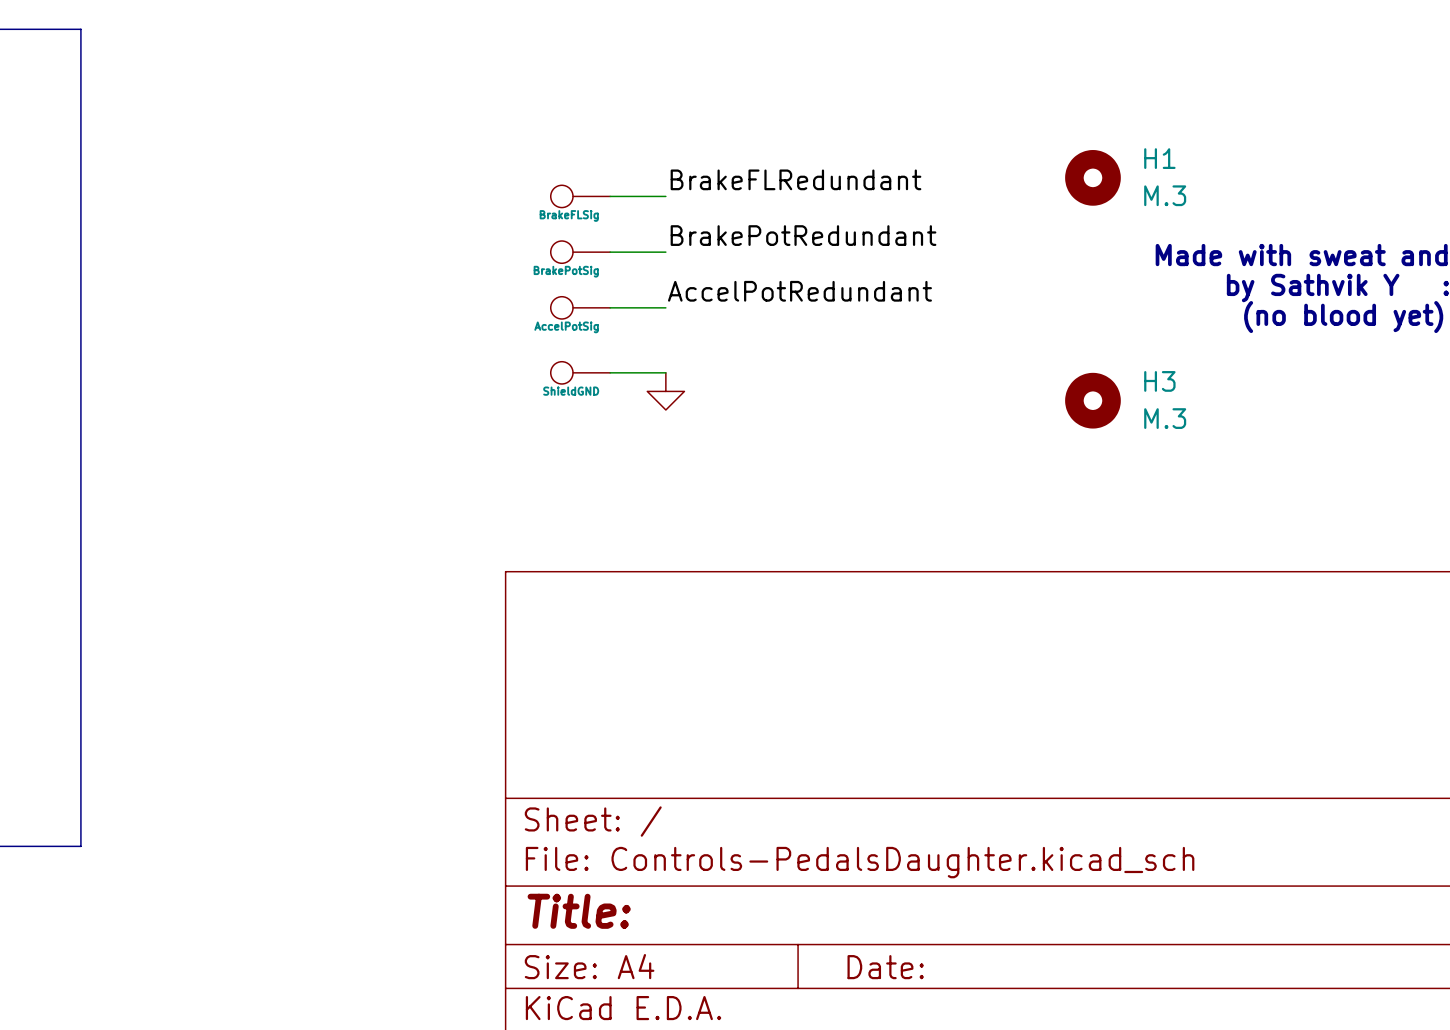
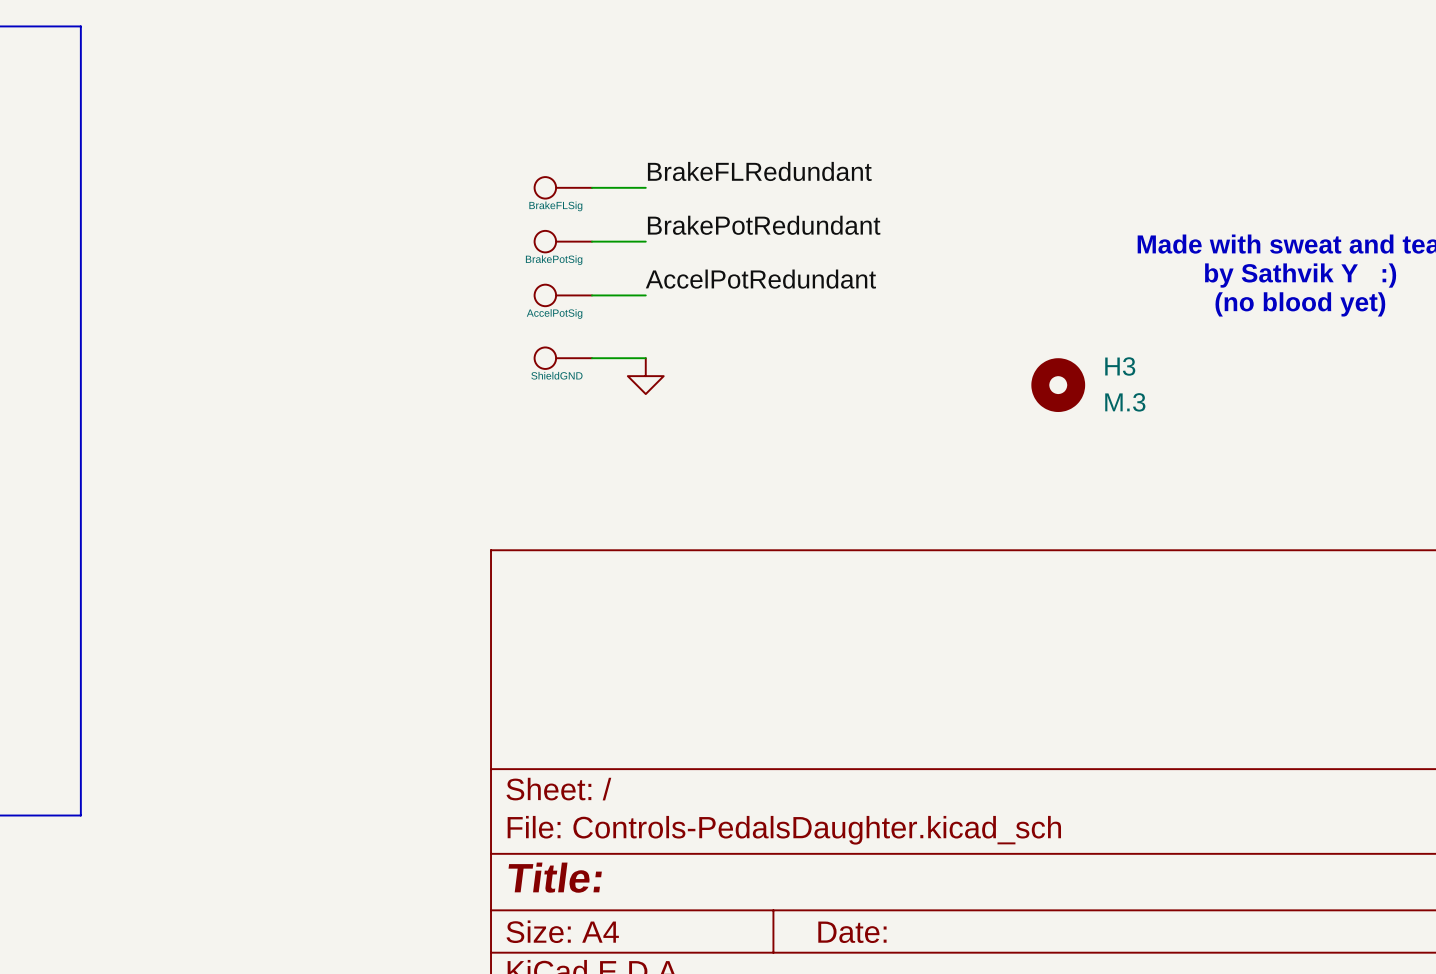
H1: M.3 (1092, 177) -> none

